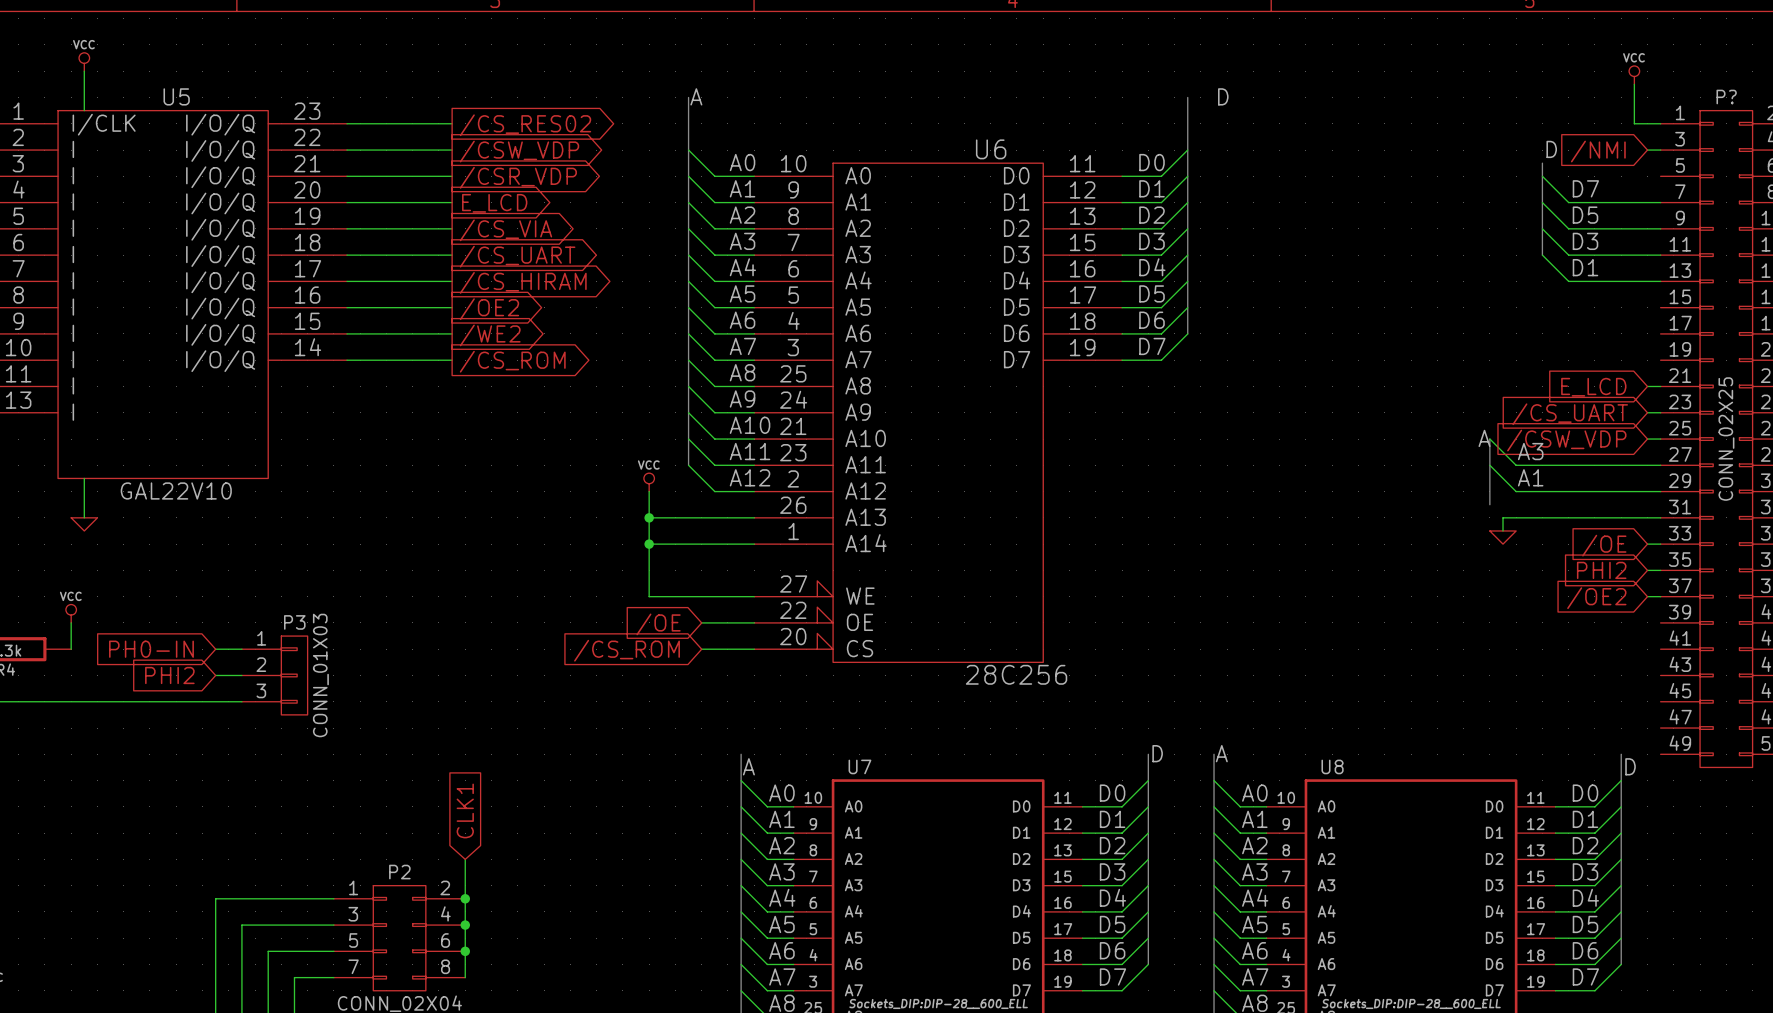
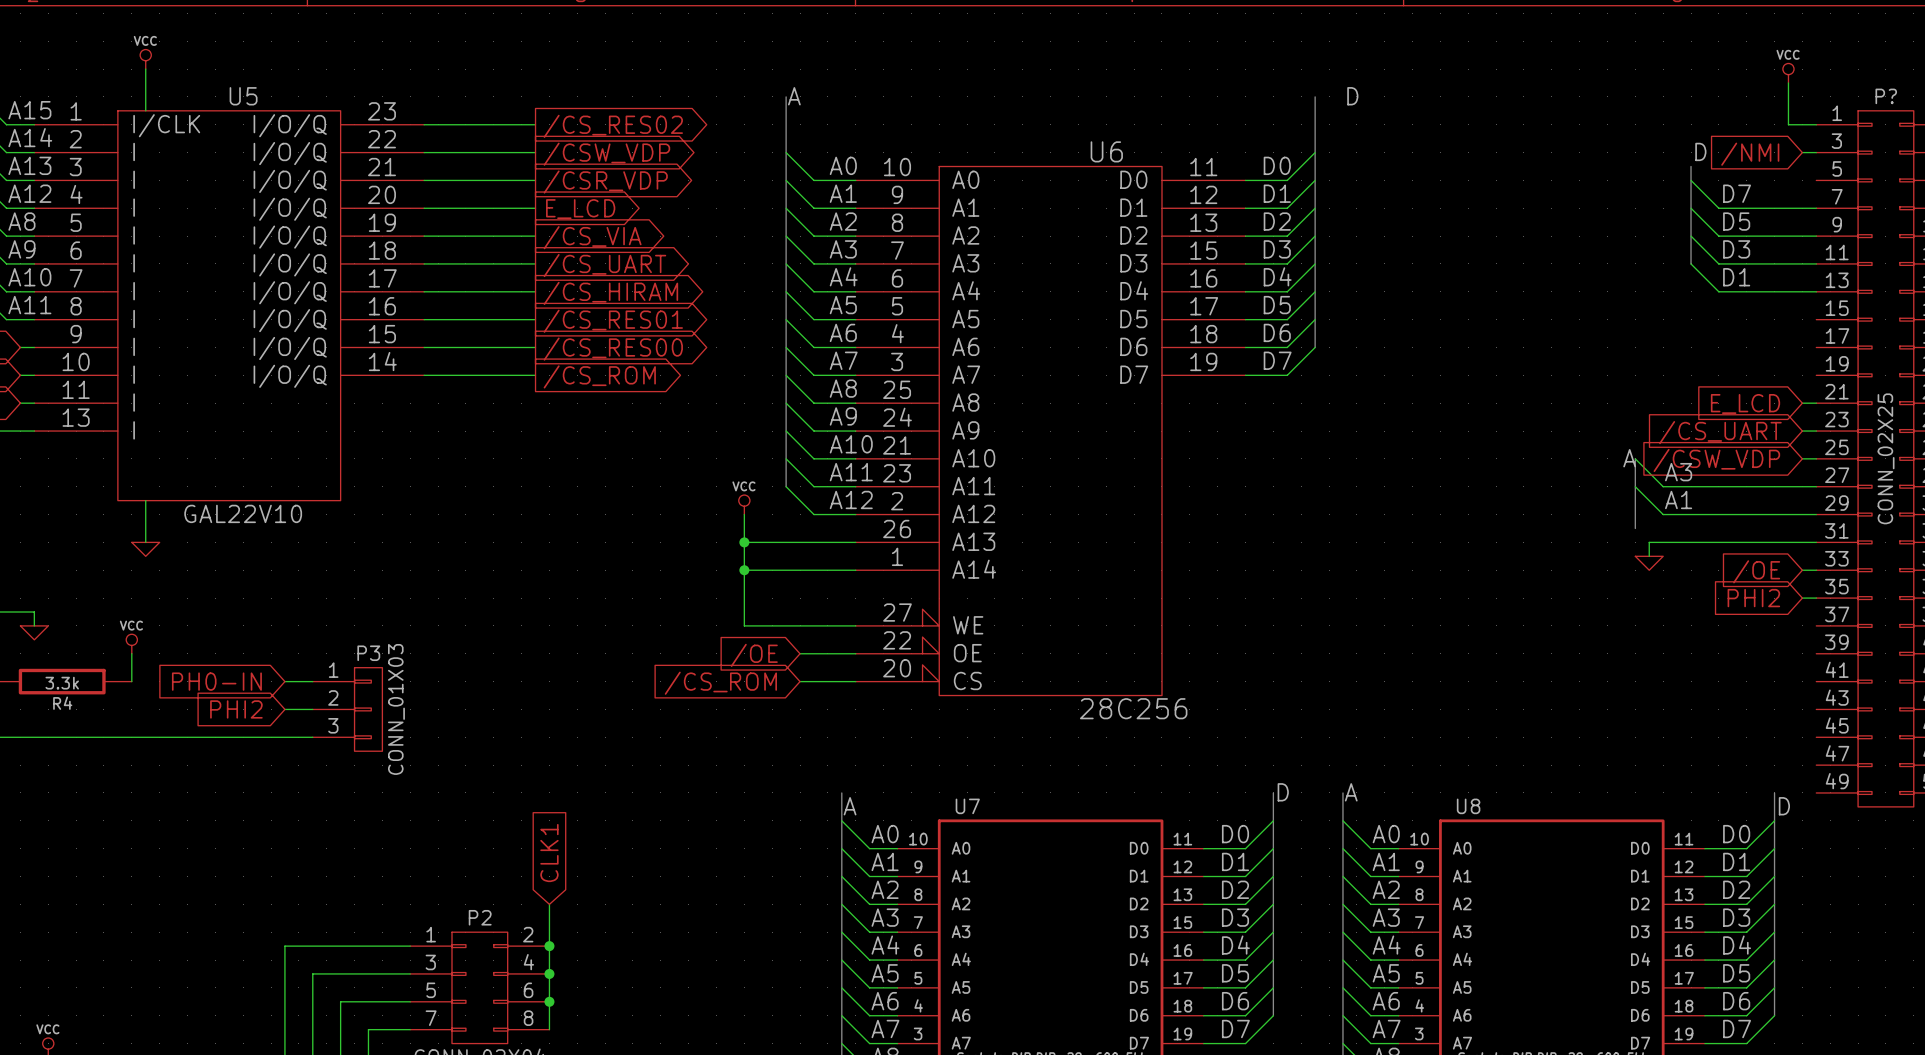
global label: /OE2 (489, 309) -> /CS_RES01 (613, 321)
global label: /WE2 (490, 335) -> /CS_RES00 (613, 349)
wire: (1647, 596) (1660, 596) -> none
global label: /OE2 (1596, 598) -> none

